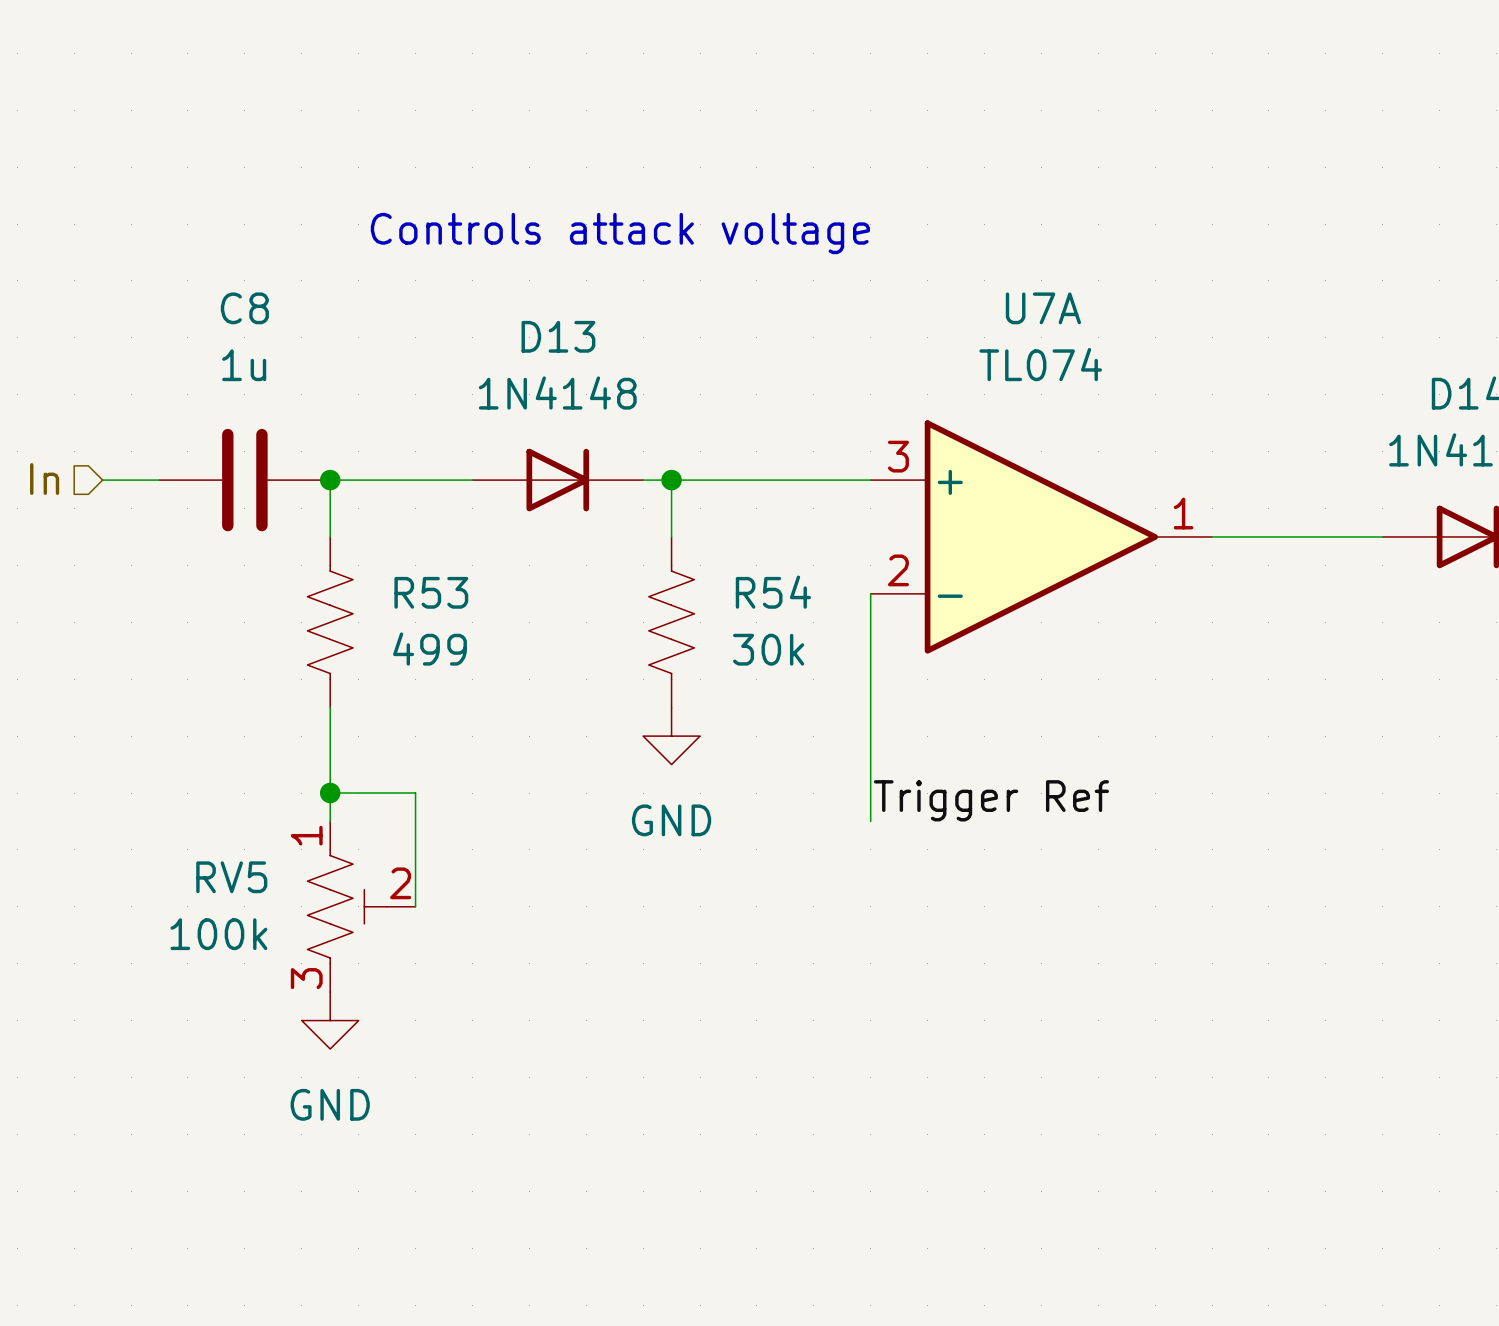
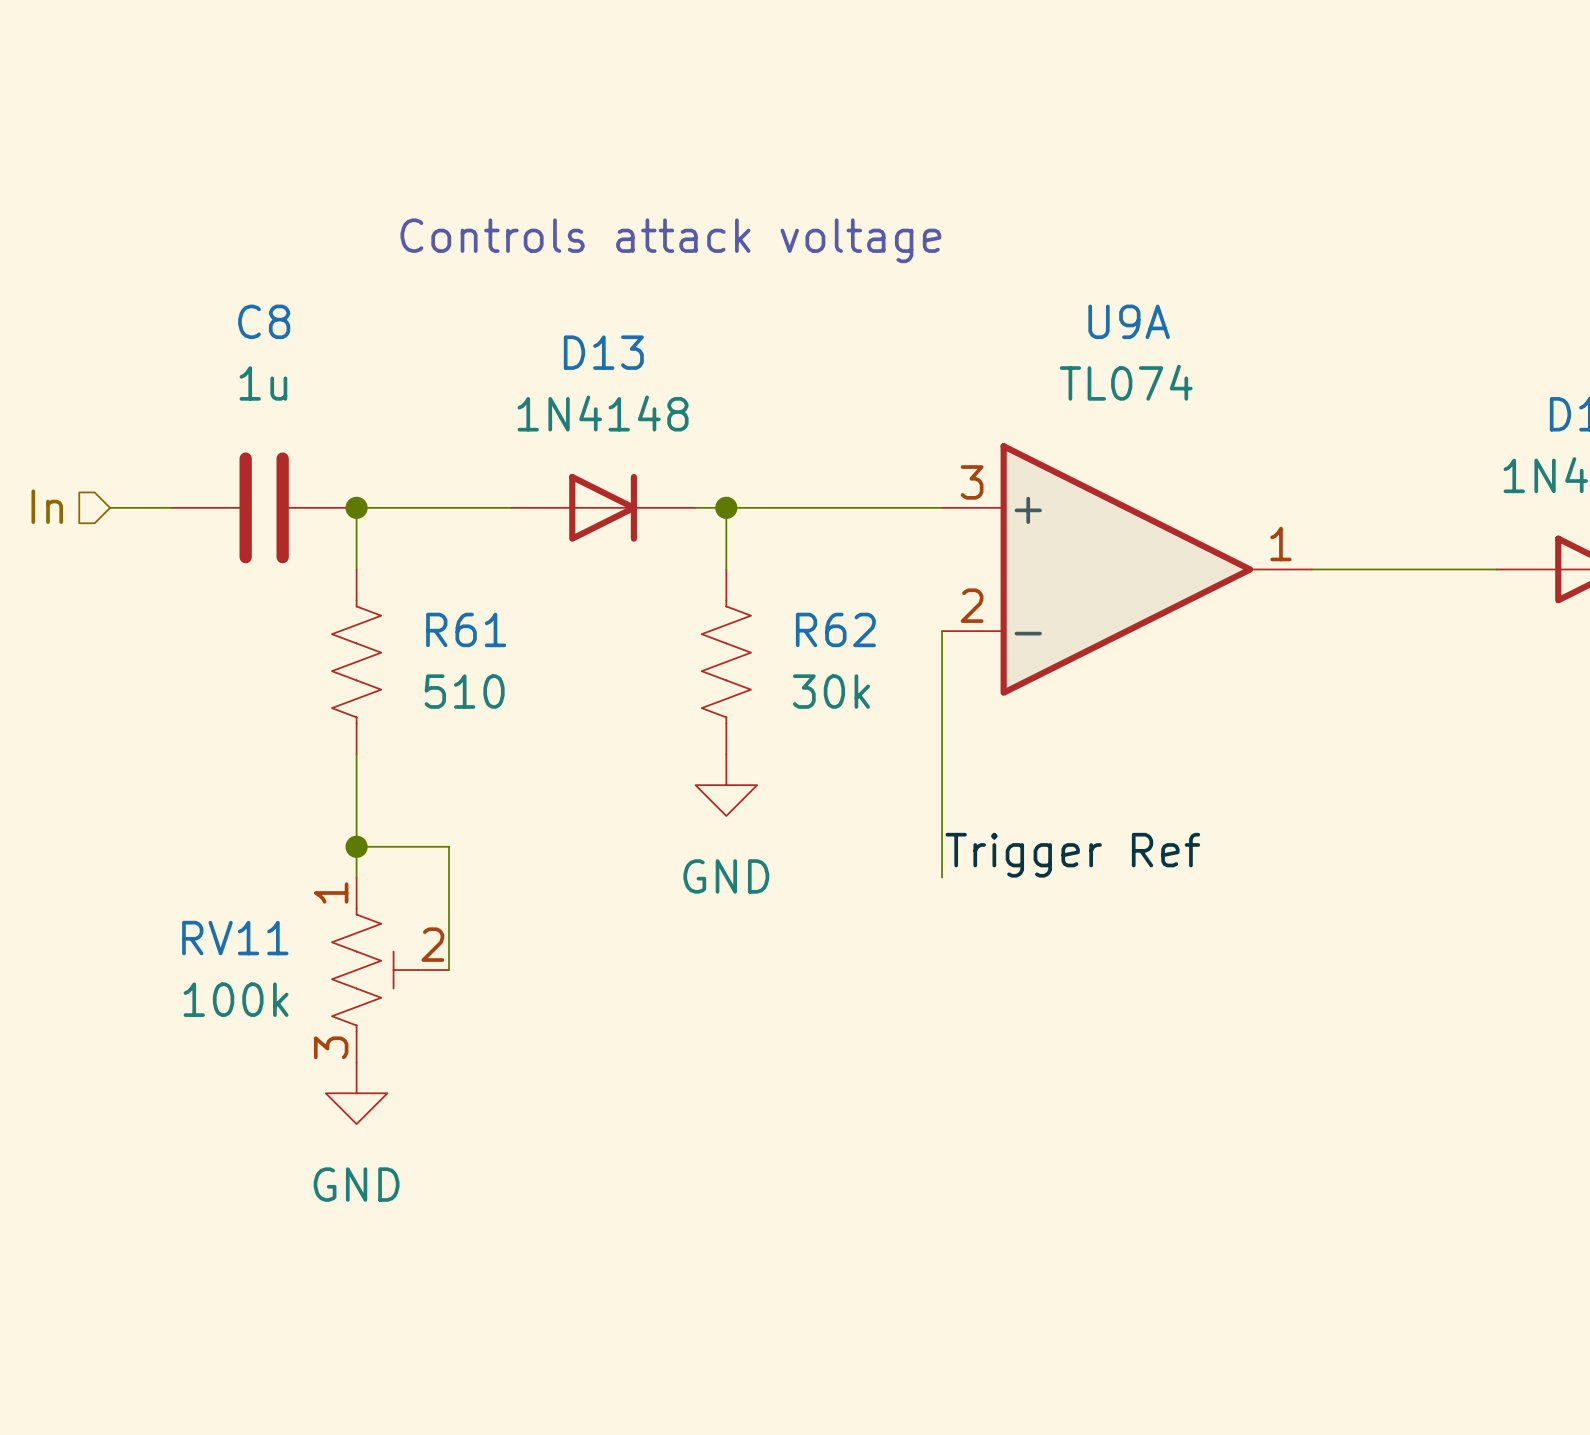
U7A name: U7A (1043, 308) -> U9A (1129, 321)
R53 name: R53 (431, 592) -> R61 (466, 629)
R54 name: R54 (773, 592) -> R62 (835, 629)
R53 value: 499 (429, 649) -> 510 (464, 691)
RV5 name: RV5 (231, 877) -> RV11 (235, 938)

